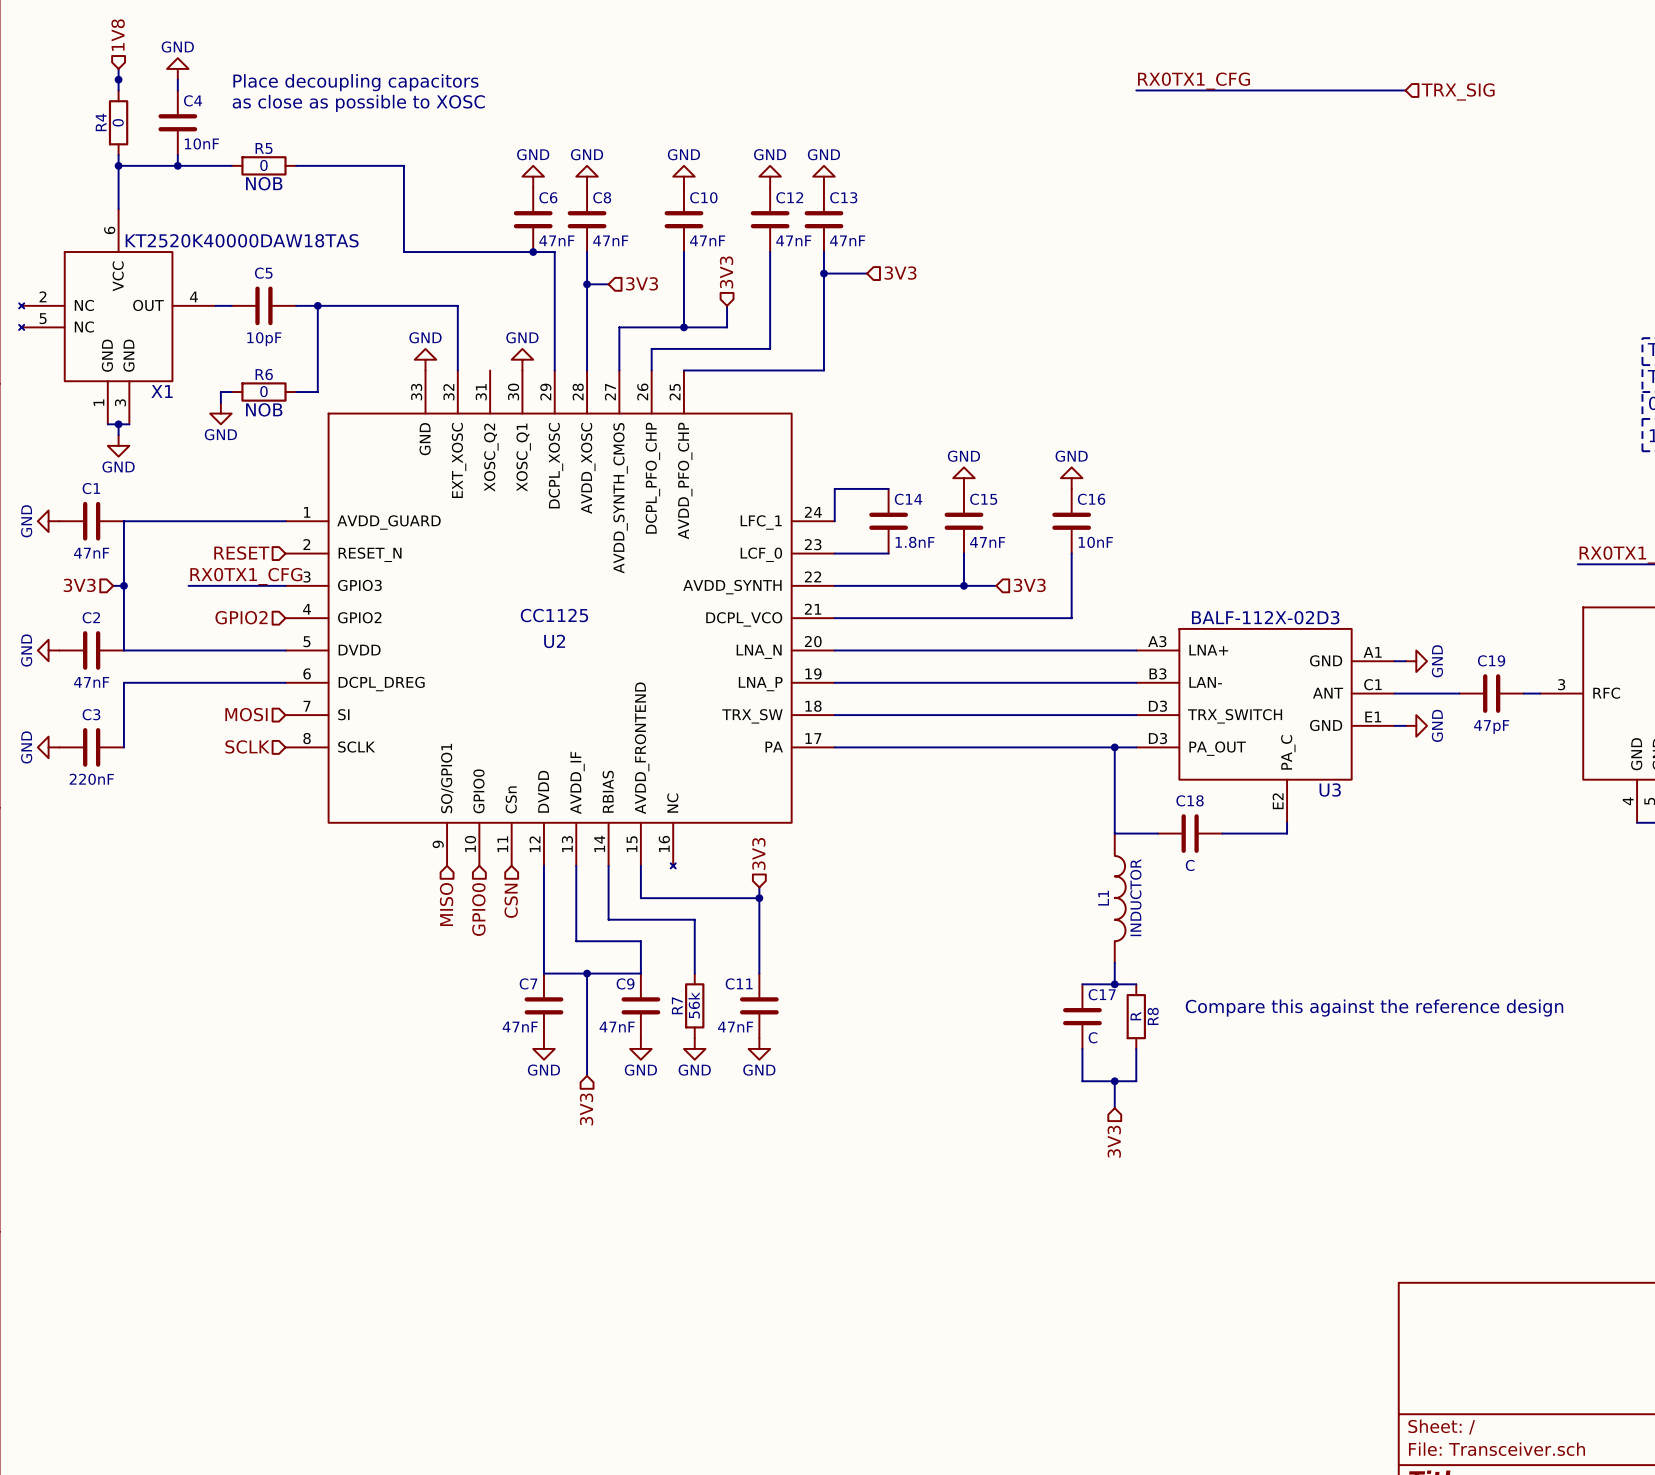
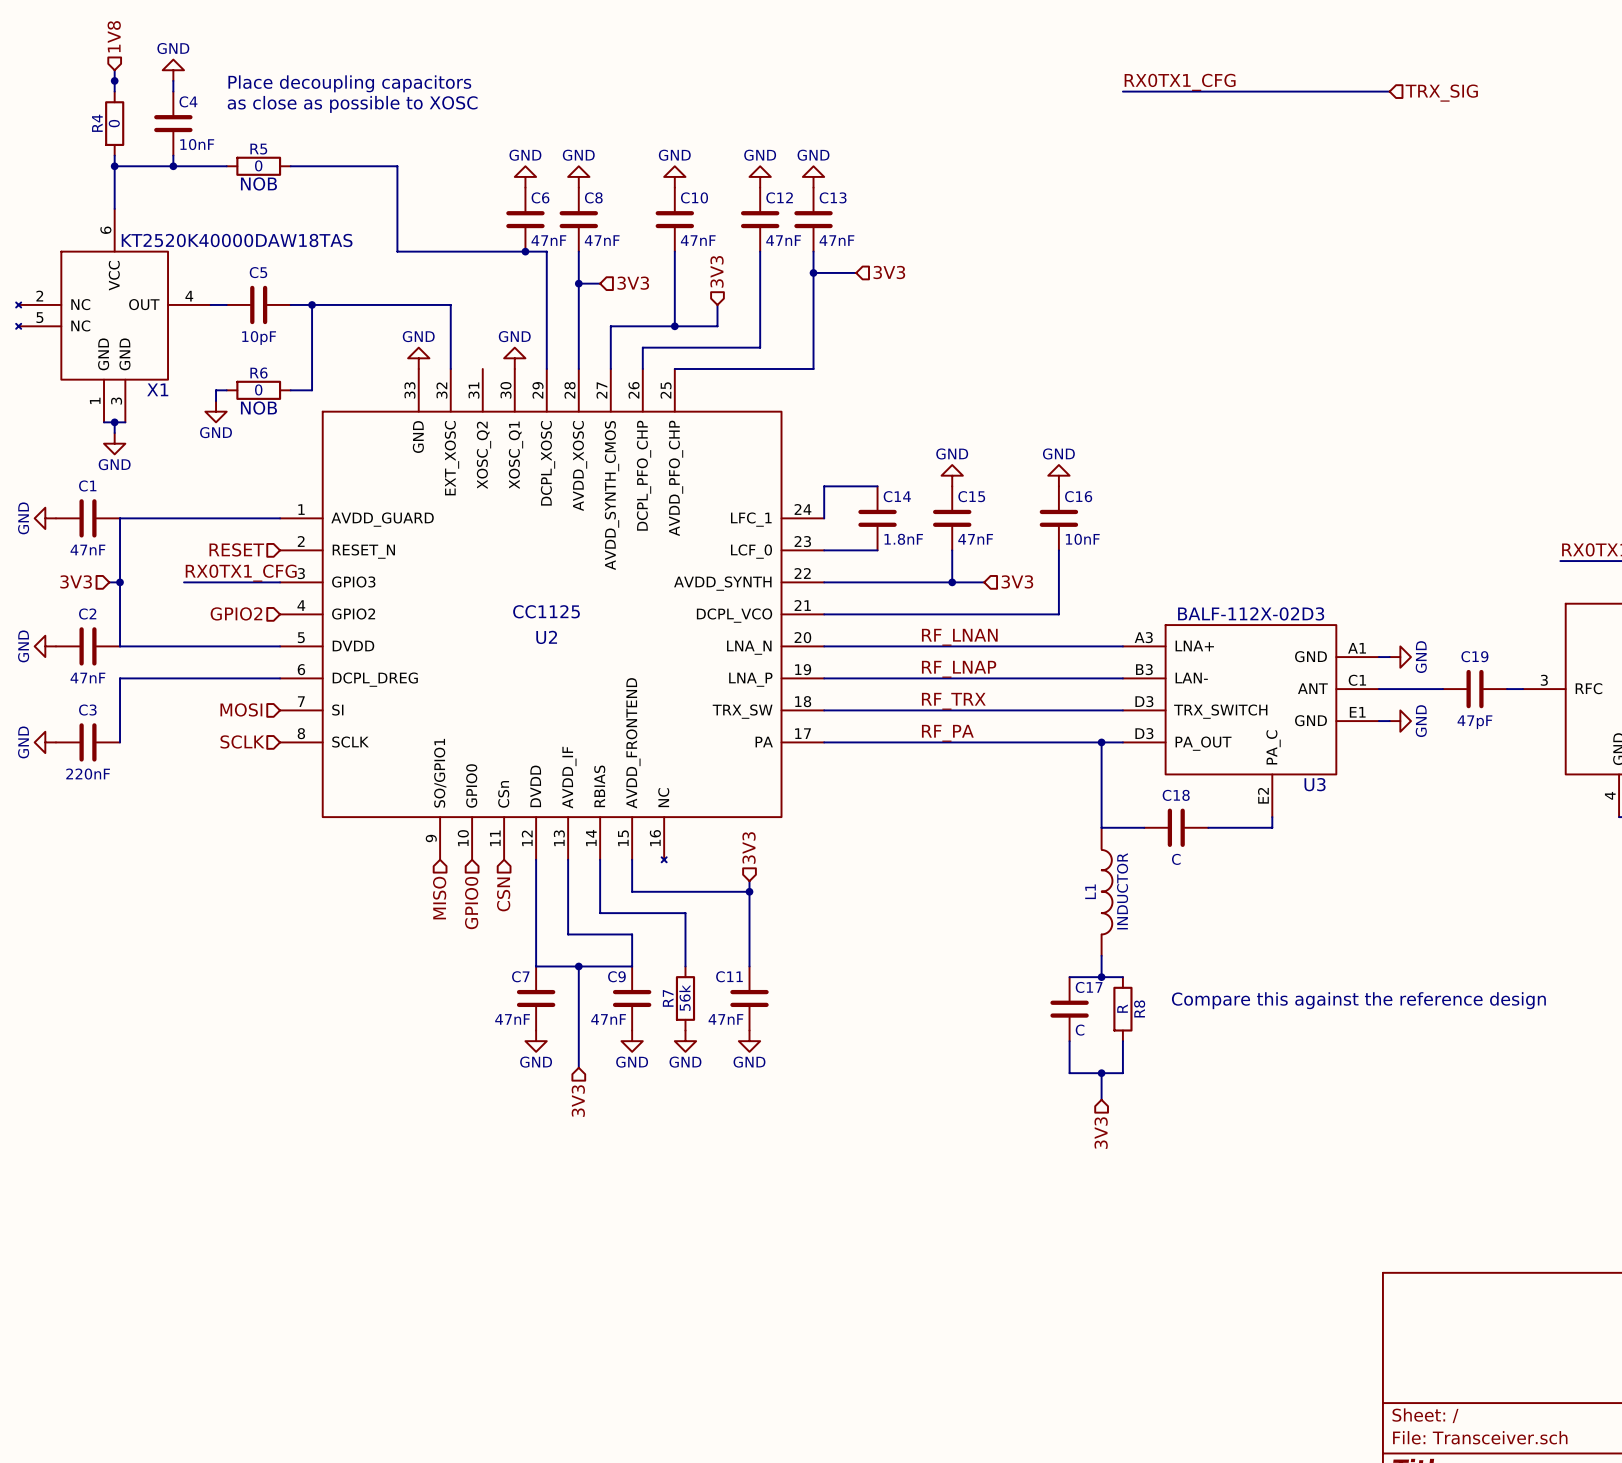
label: none -> RF_LNAN (959, 637)
label: none -> RF_LNAP (959, 669)
label: none -> RF_TRX (953, 701)
label: none -> RF_PA (947, 733)

